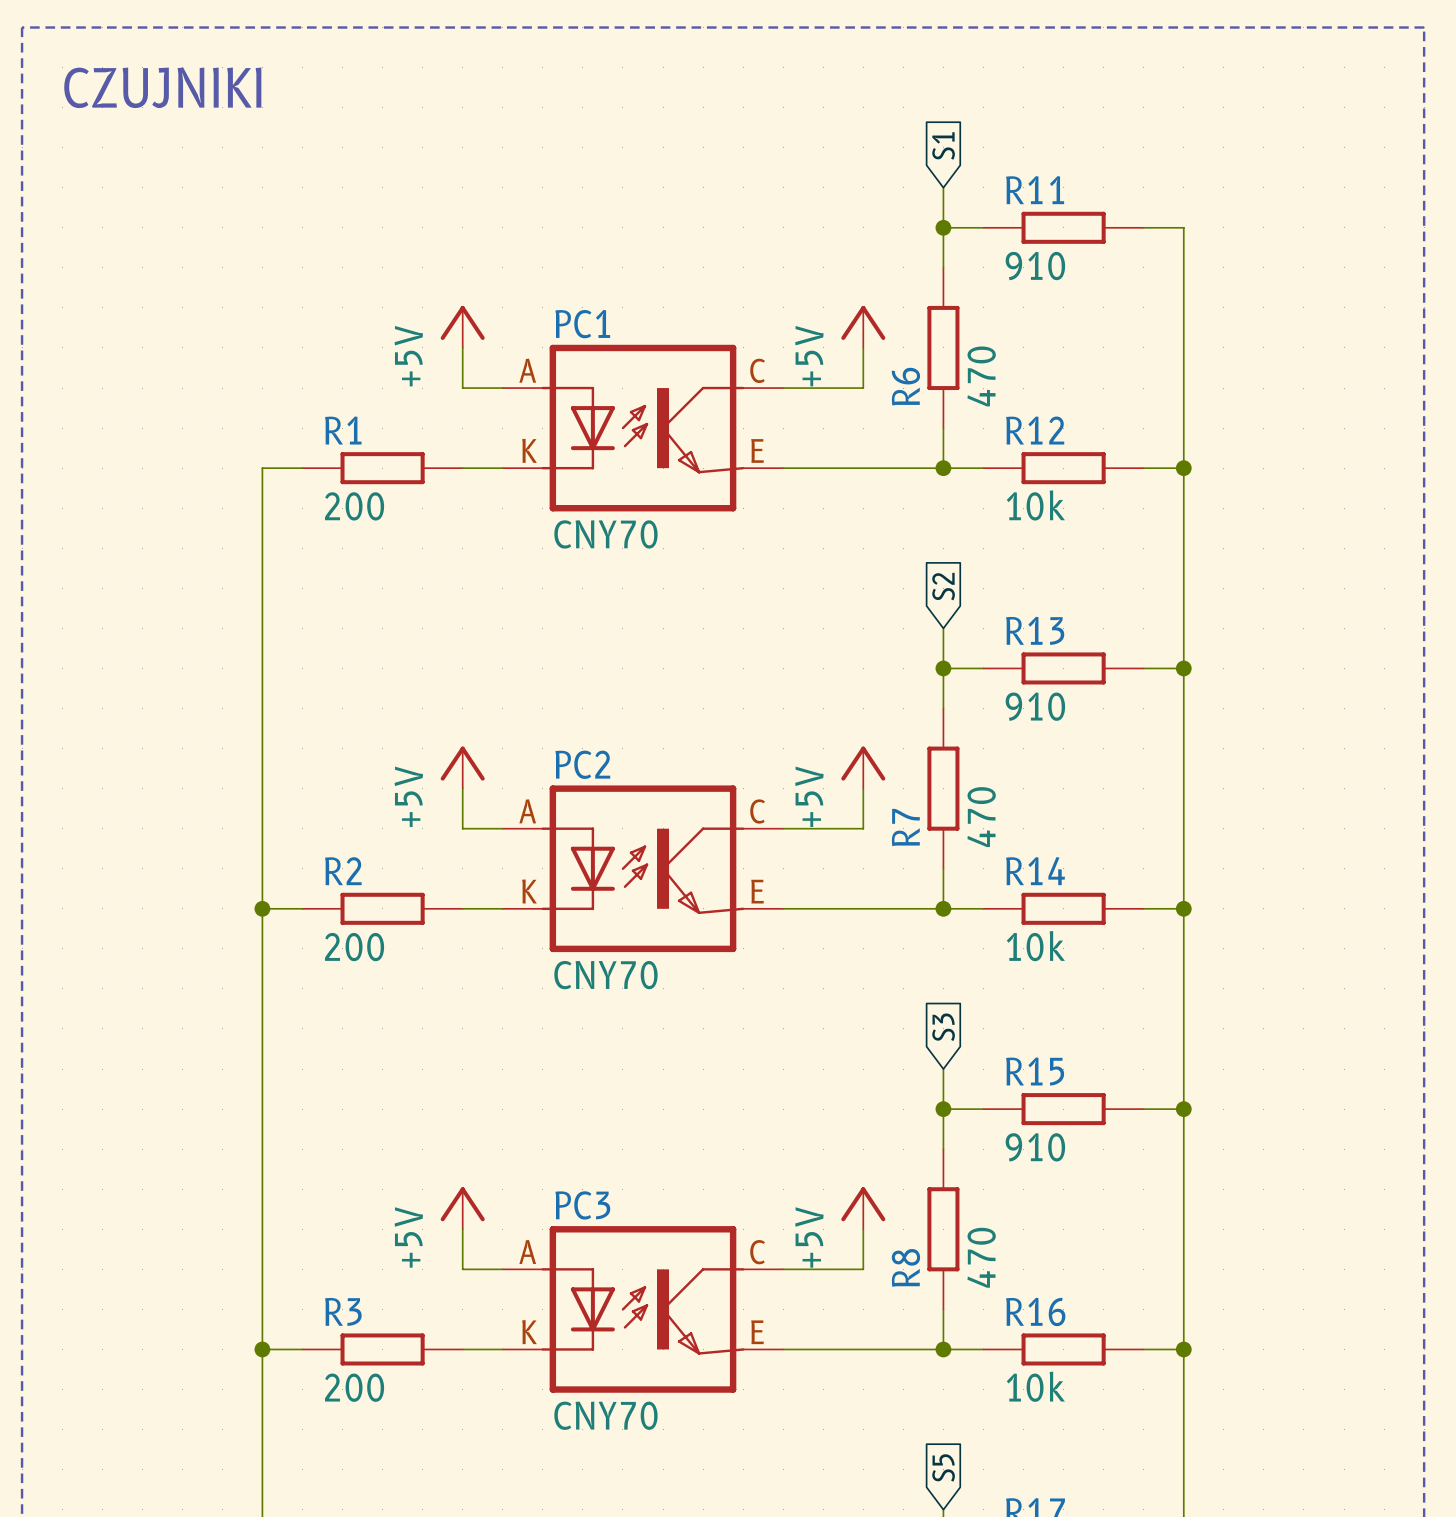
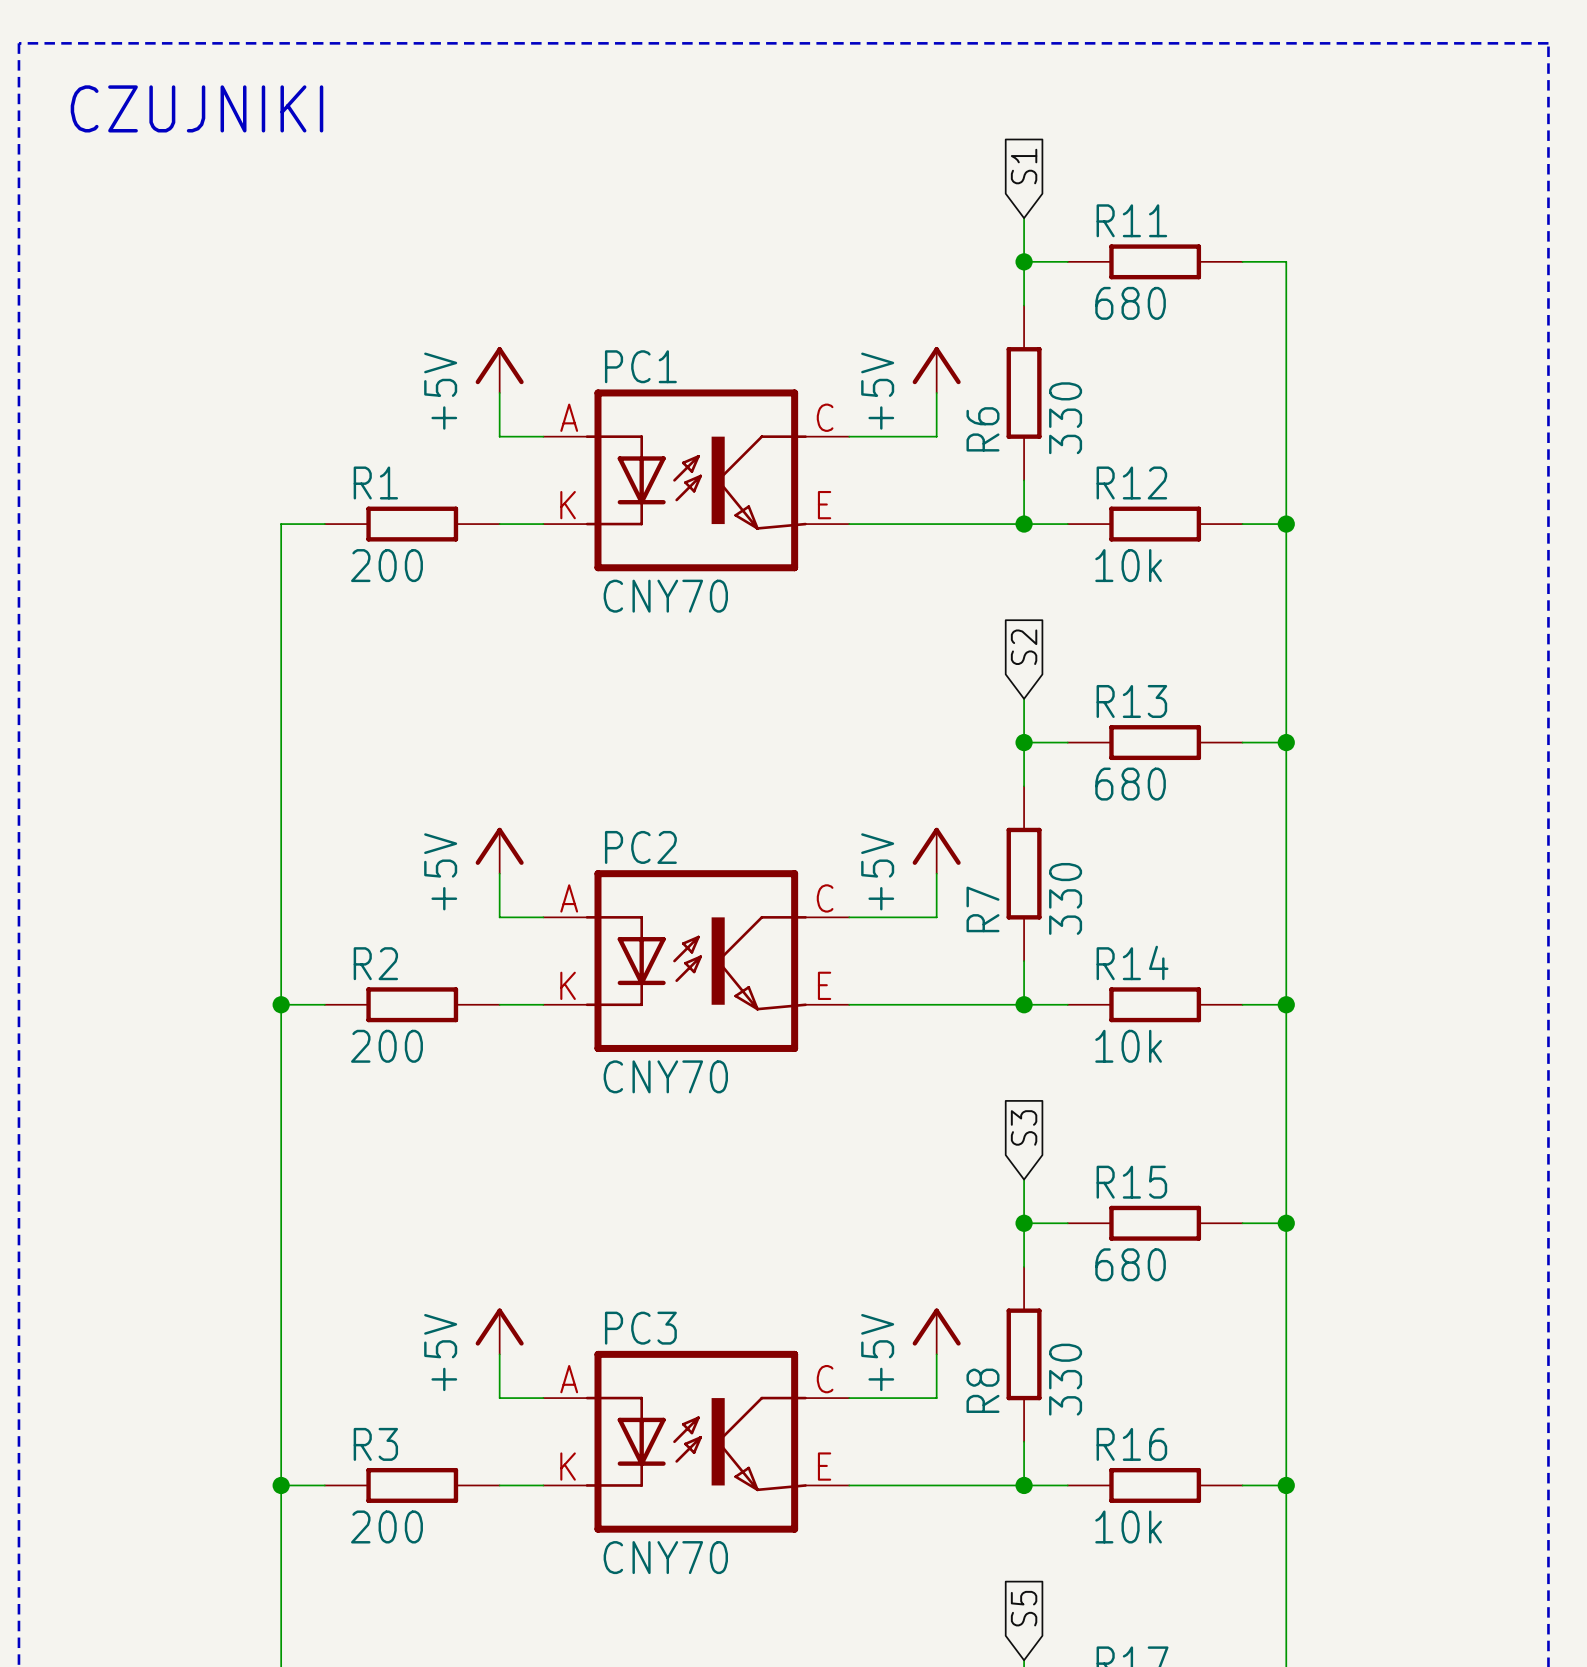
R11 value: 910 (1035, 266) -> 680 (1130, 303)
R6 value: 470 (981, 376) -> 330 (1065, 418)
R13 value: 910 (1035, 706) -> 680 (1130, 784)
R7 value: 470 (981, 817) -> 330 (1065, 898)
R15 value: 910 (1035, 1147) -> 680 (1130, 1264)
R8 value: 470 (981, 1257) -> 330 (1065, 1379)

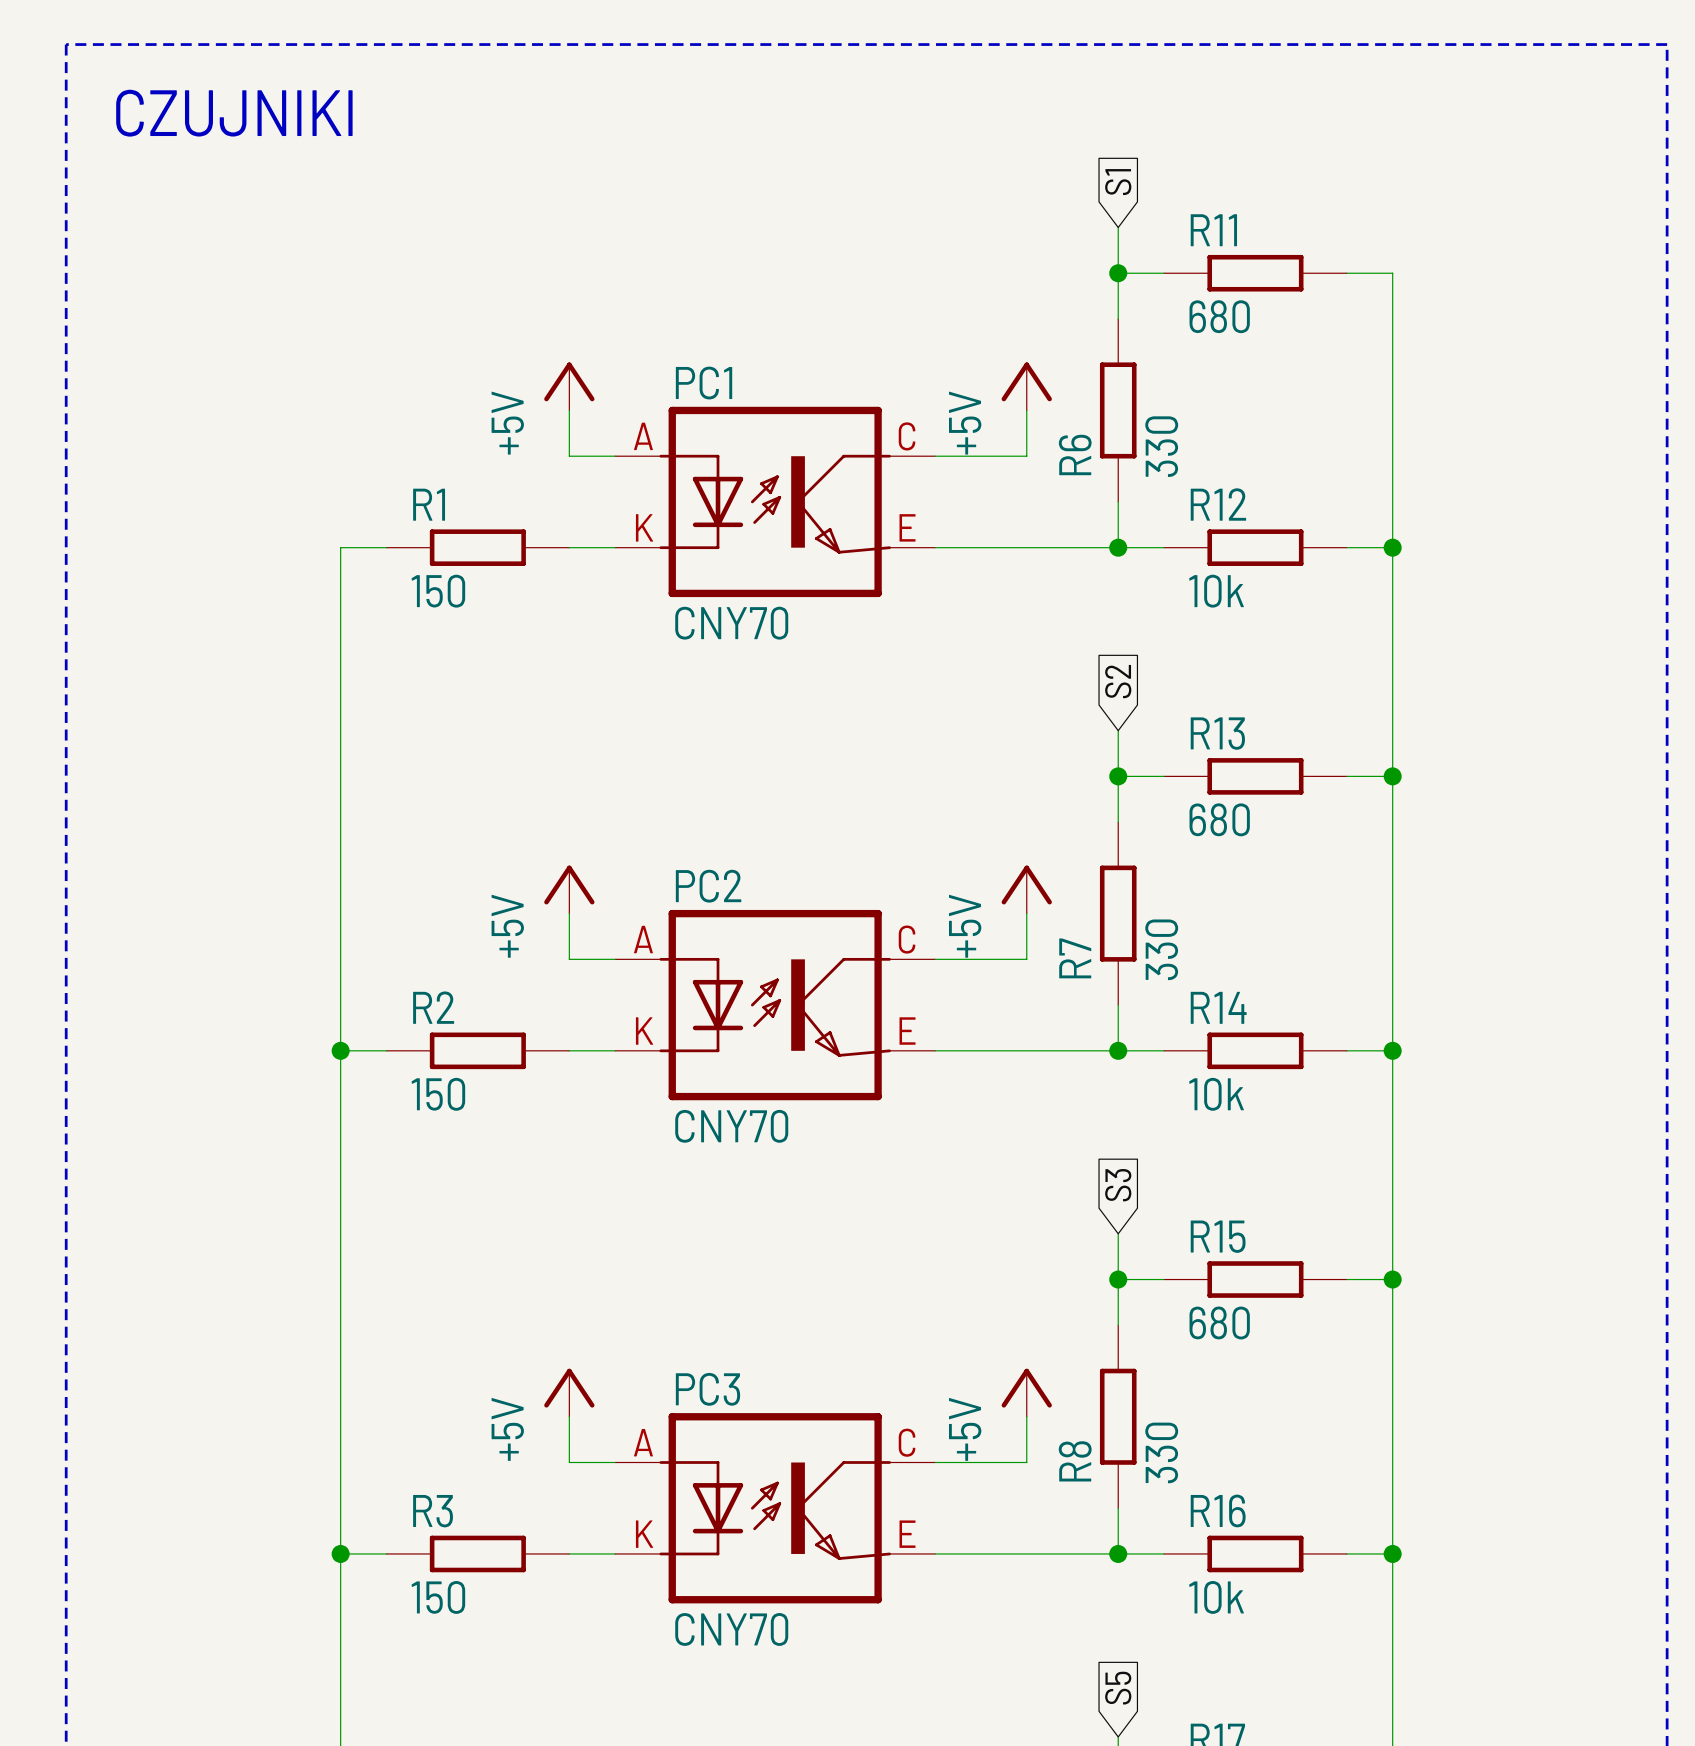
R1 value: 200 (386, 565) -> 150 (438, 591)
R2 value: 200 (386, 1046) -> 150 (438, 1094)
R3 value: 200 (386, 1526) -> 150 (438, 1597)

